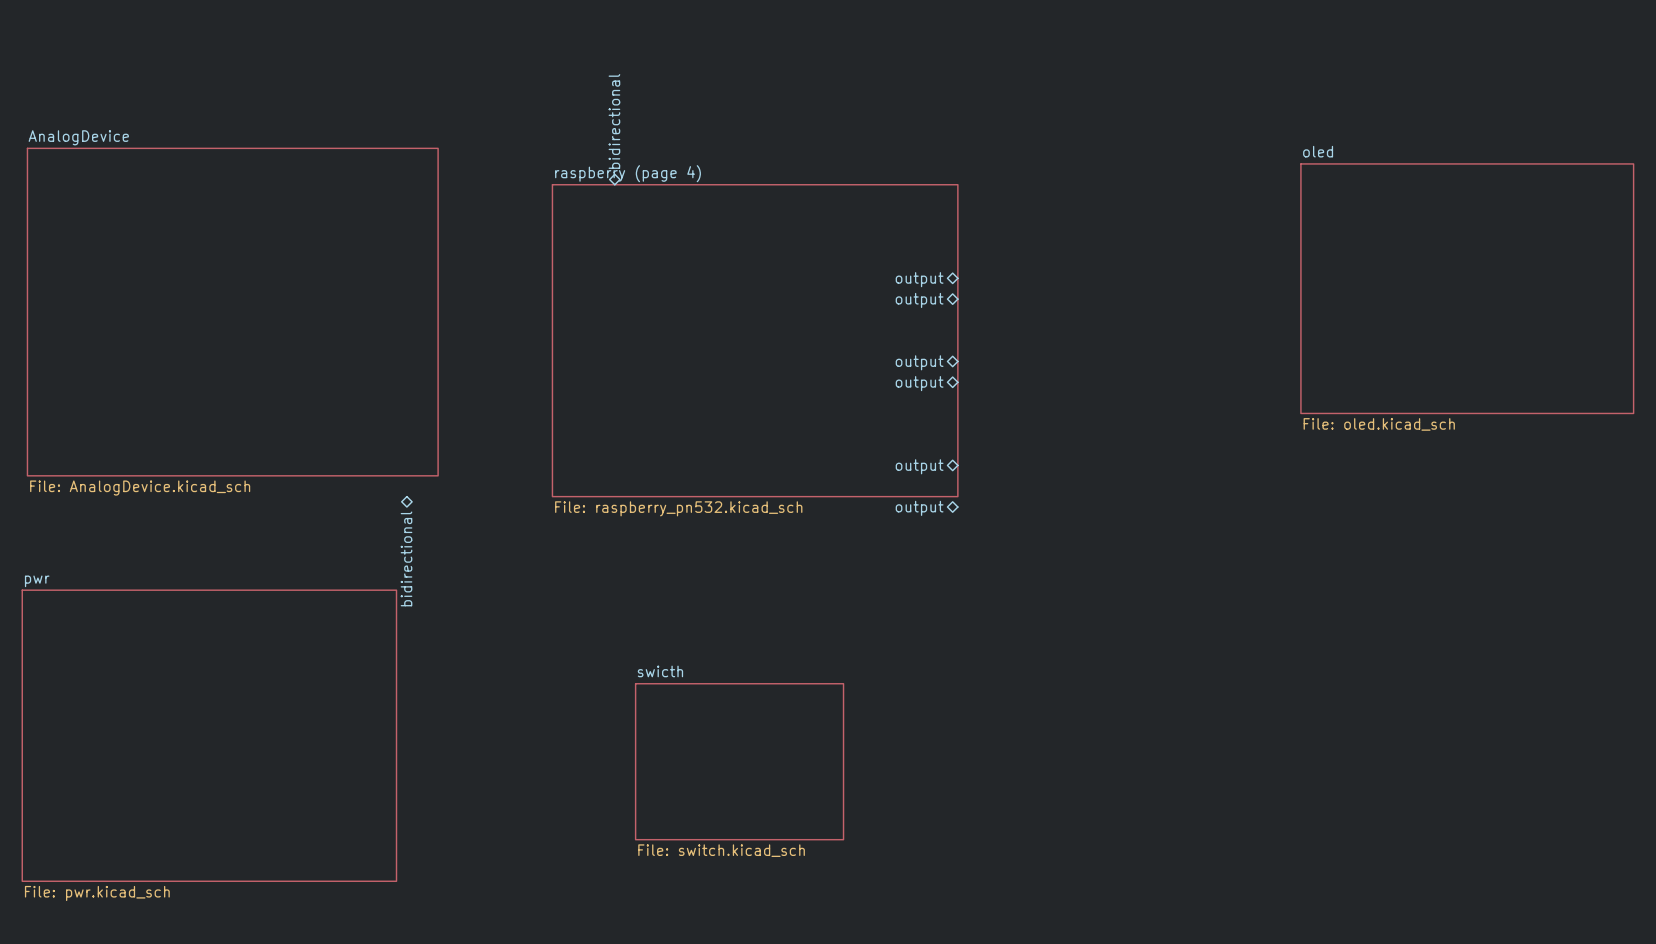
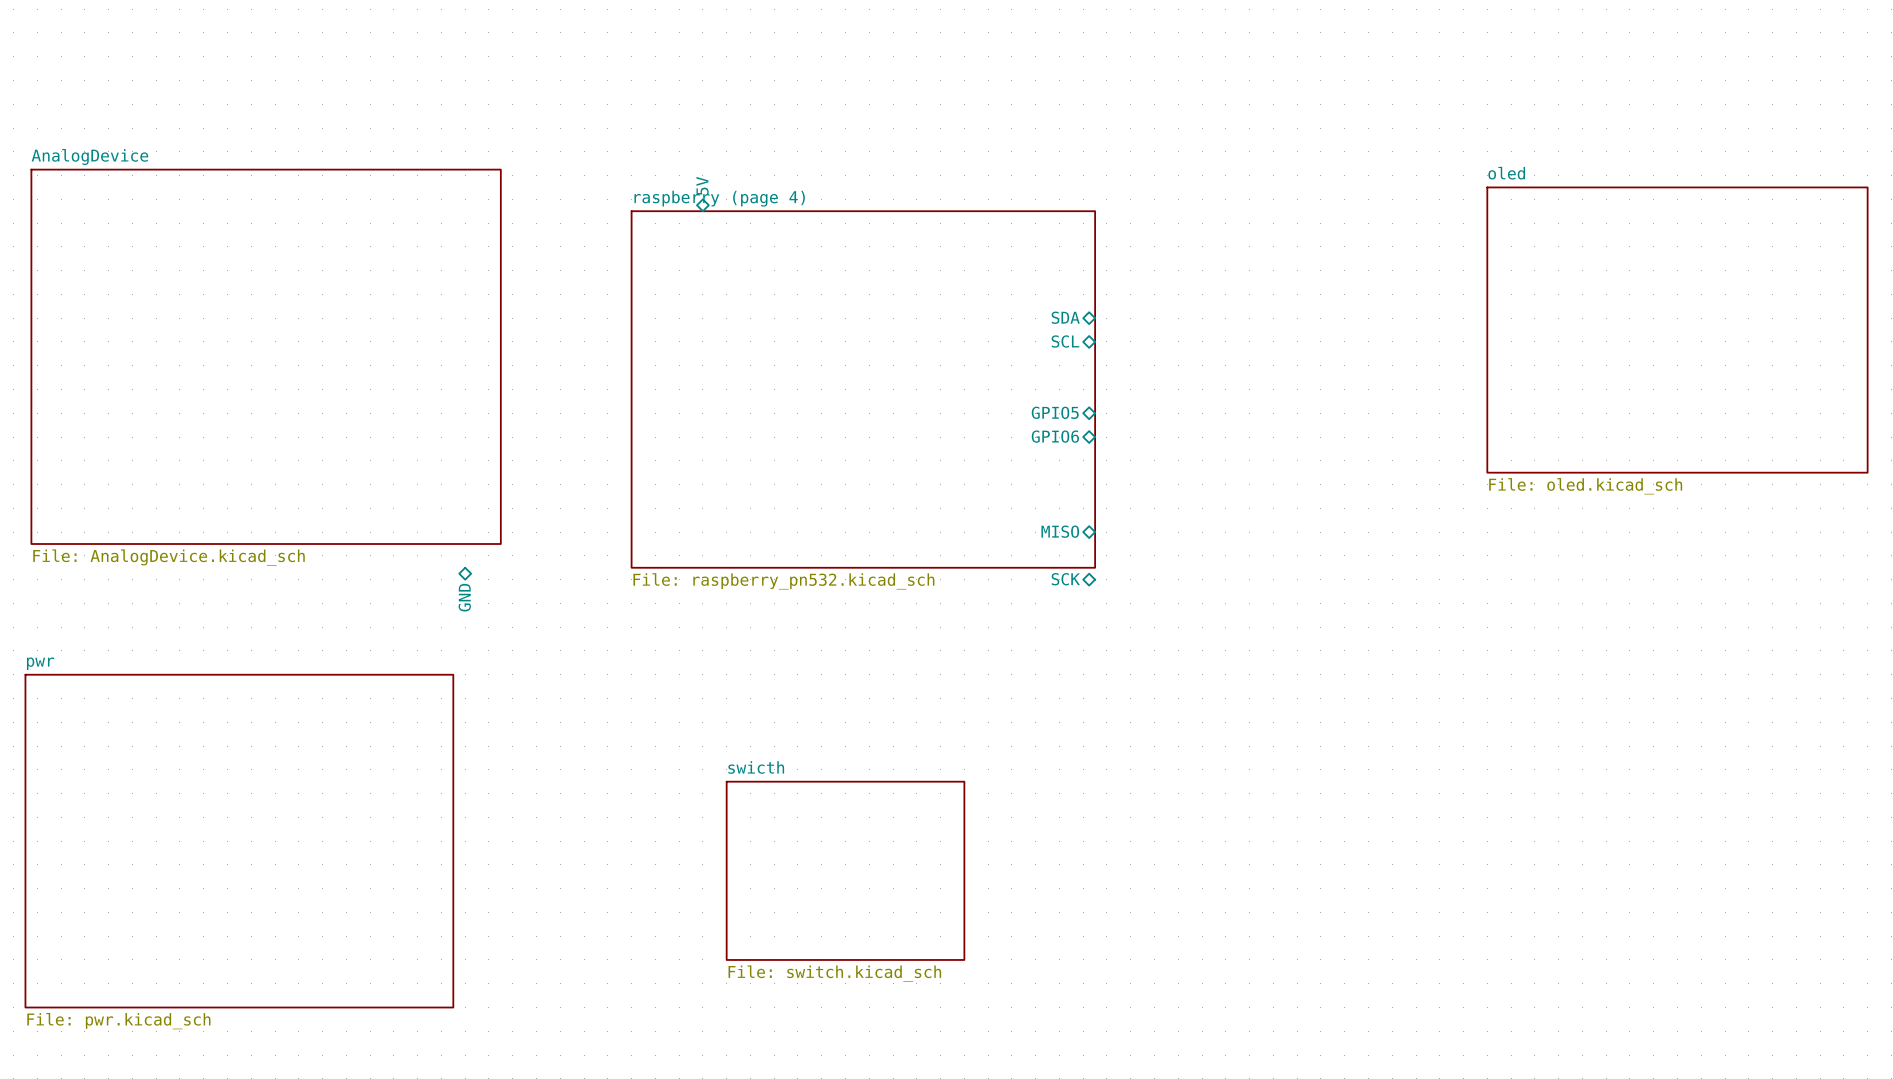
sheet pin: bidirectional (614, 121) -> 5V (702, 185)
sheet pin: output (919, 279) -> SDA (1065, 317)
sheet pin: output (919, 300) -> SCL (1065, 341)
sheet pin: output (919, 362) -> GPIO5 (1055, 412)
sheet pin: output (919, 383) -> GPIO6 (1055, 436)
sheet pin: output (919, 466) -> MISO (1060, 531)
sheet pin: output (919, 508) -> SCK (1065, 579)
sheet pin: bidirectional (406, 558) -> GND (464, 597)

